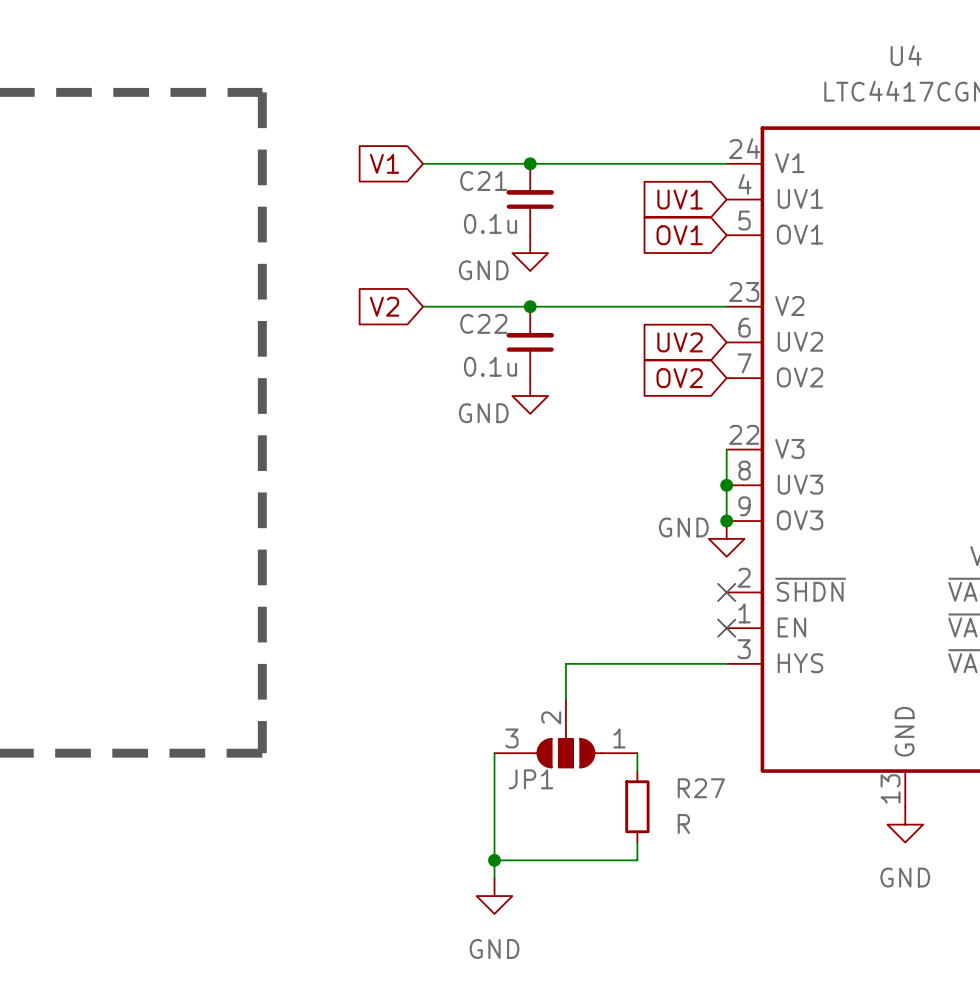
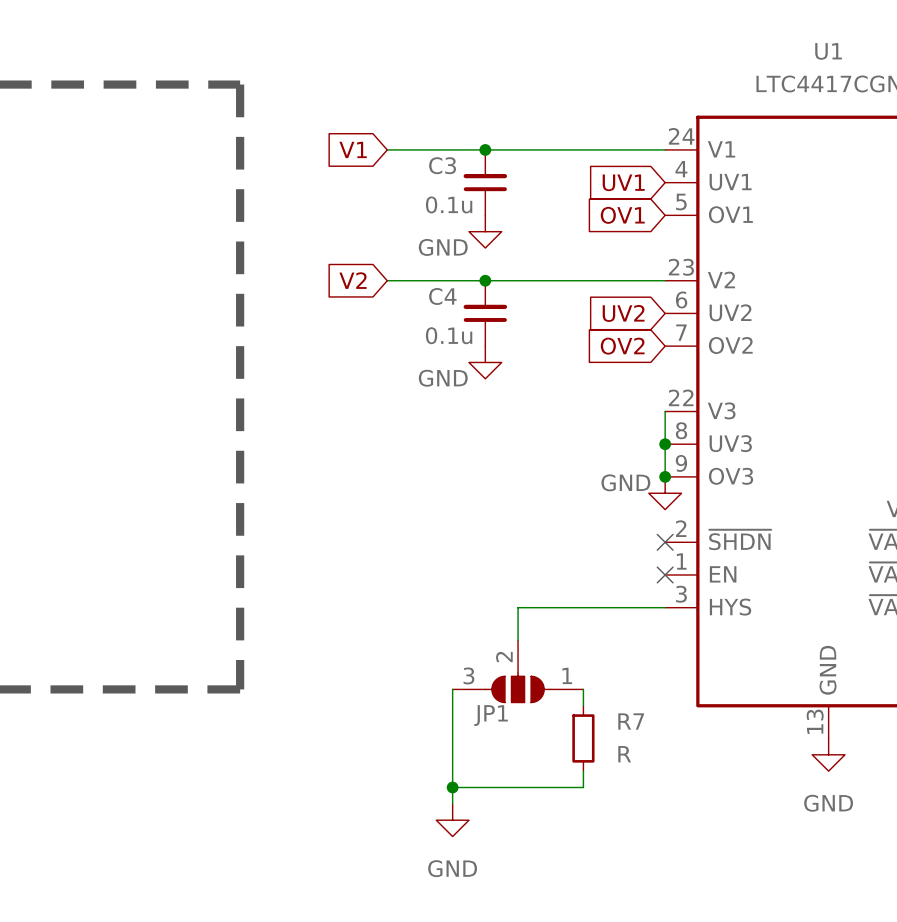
U4 name: U4 (906, 55) -> U1 (828, 51)
C21 name: C21 (483, 181) -> C3 (442, 165)
C22 name: C22 (483, 323) -> C4 (442, 296)
R27 name: R27 (701, 788) -> R7 (631, 721)

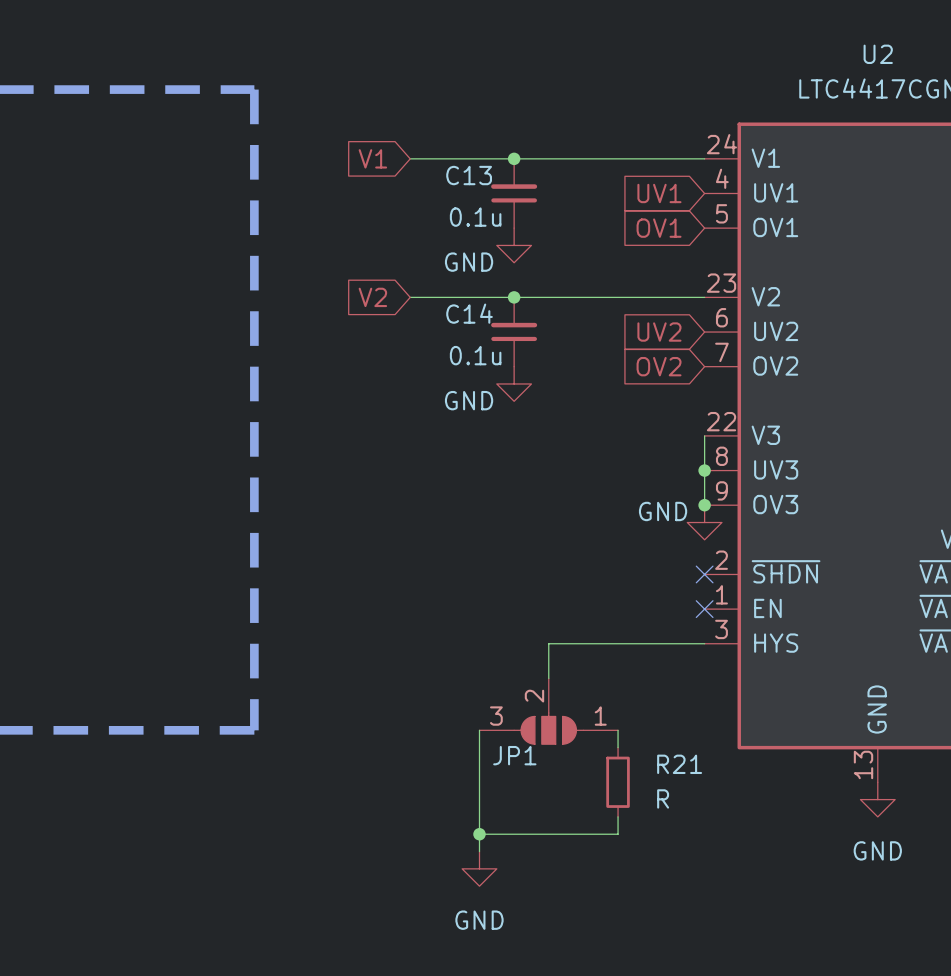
U1 name: U1 (828, 51) -> U2 (878, 54)
C3 name: C3 (442, 165) -> C13 (469, 175)
C4 name: C4 (442, 296) -> C14 (469, 313)
R7 name: R7 (631, 721) -> R21 (679, 764)

